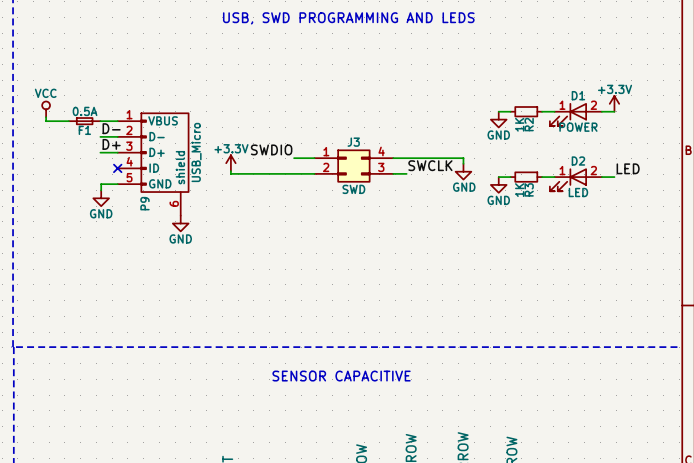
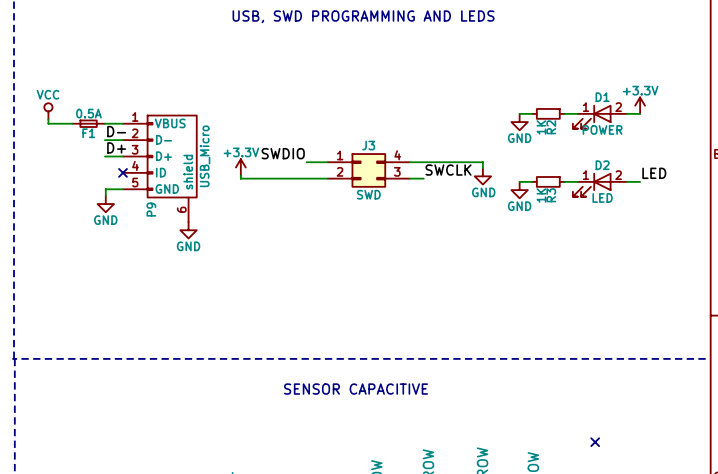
no-connect mark: none -> (595, 442)

